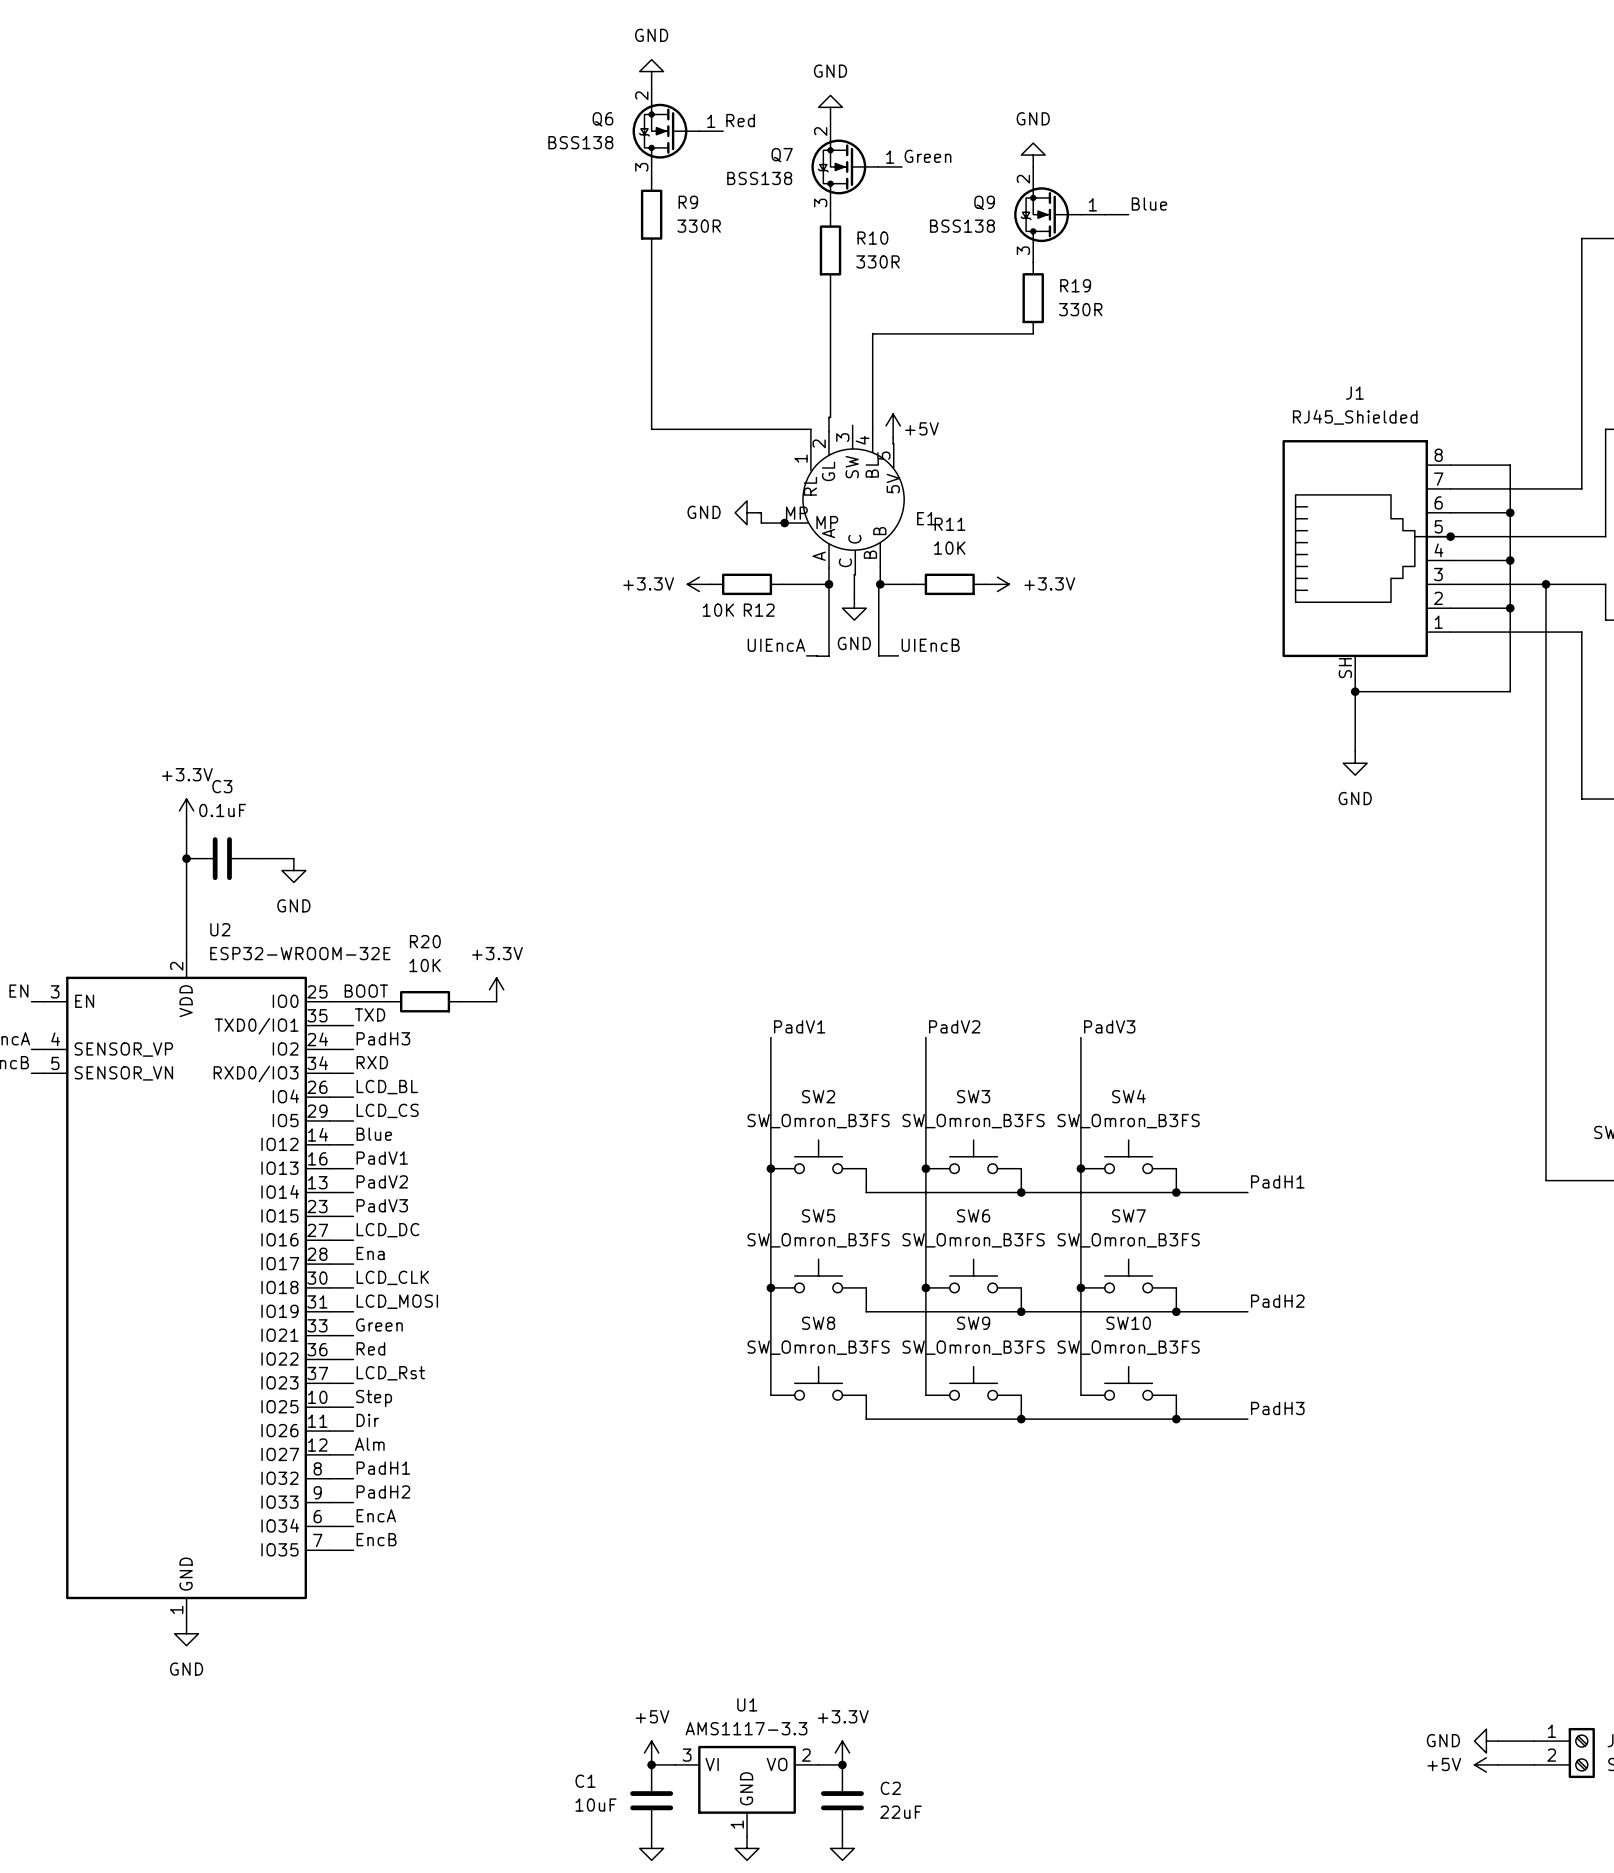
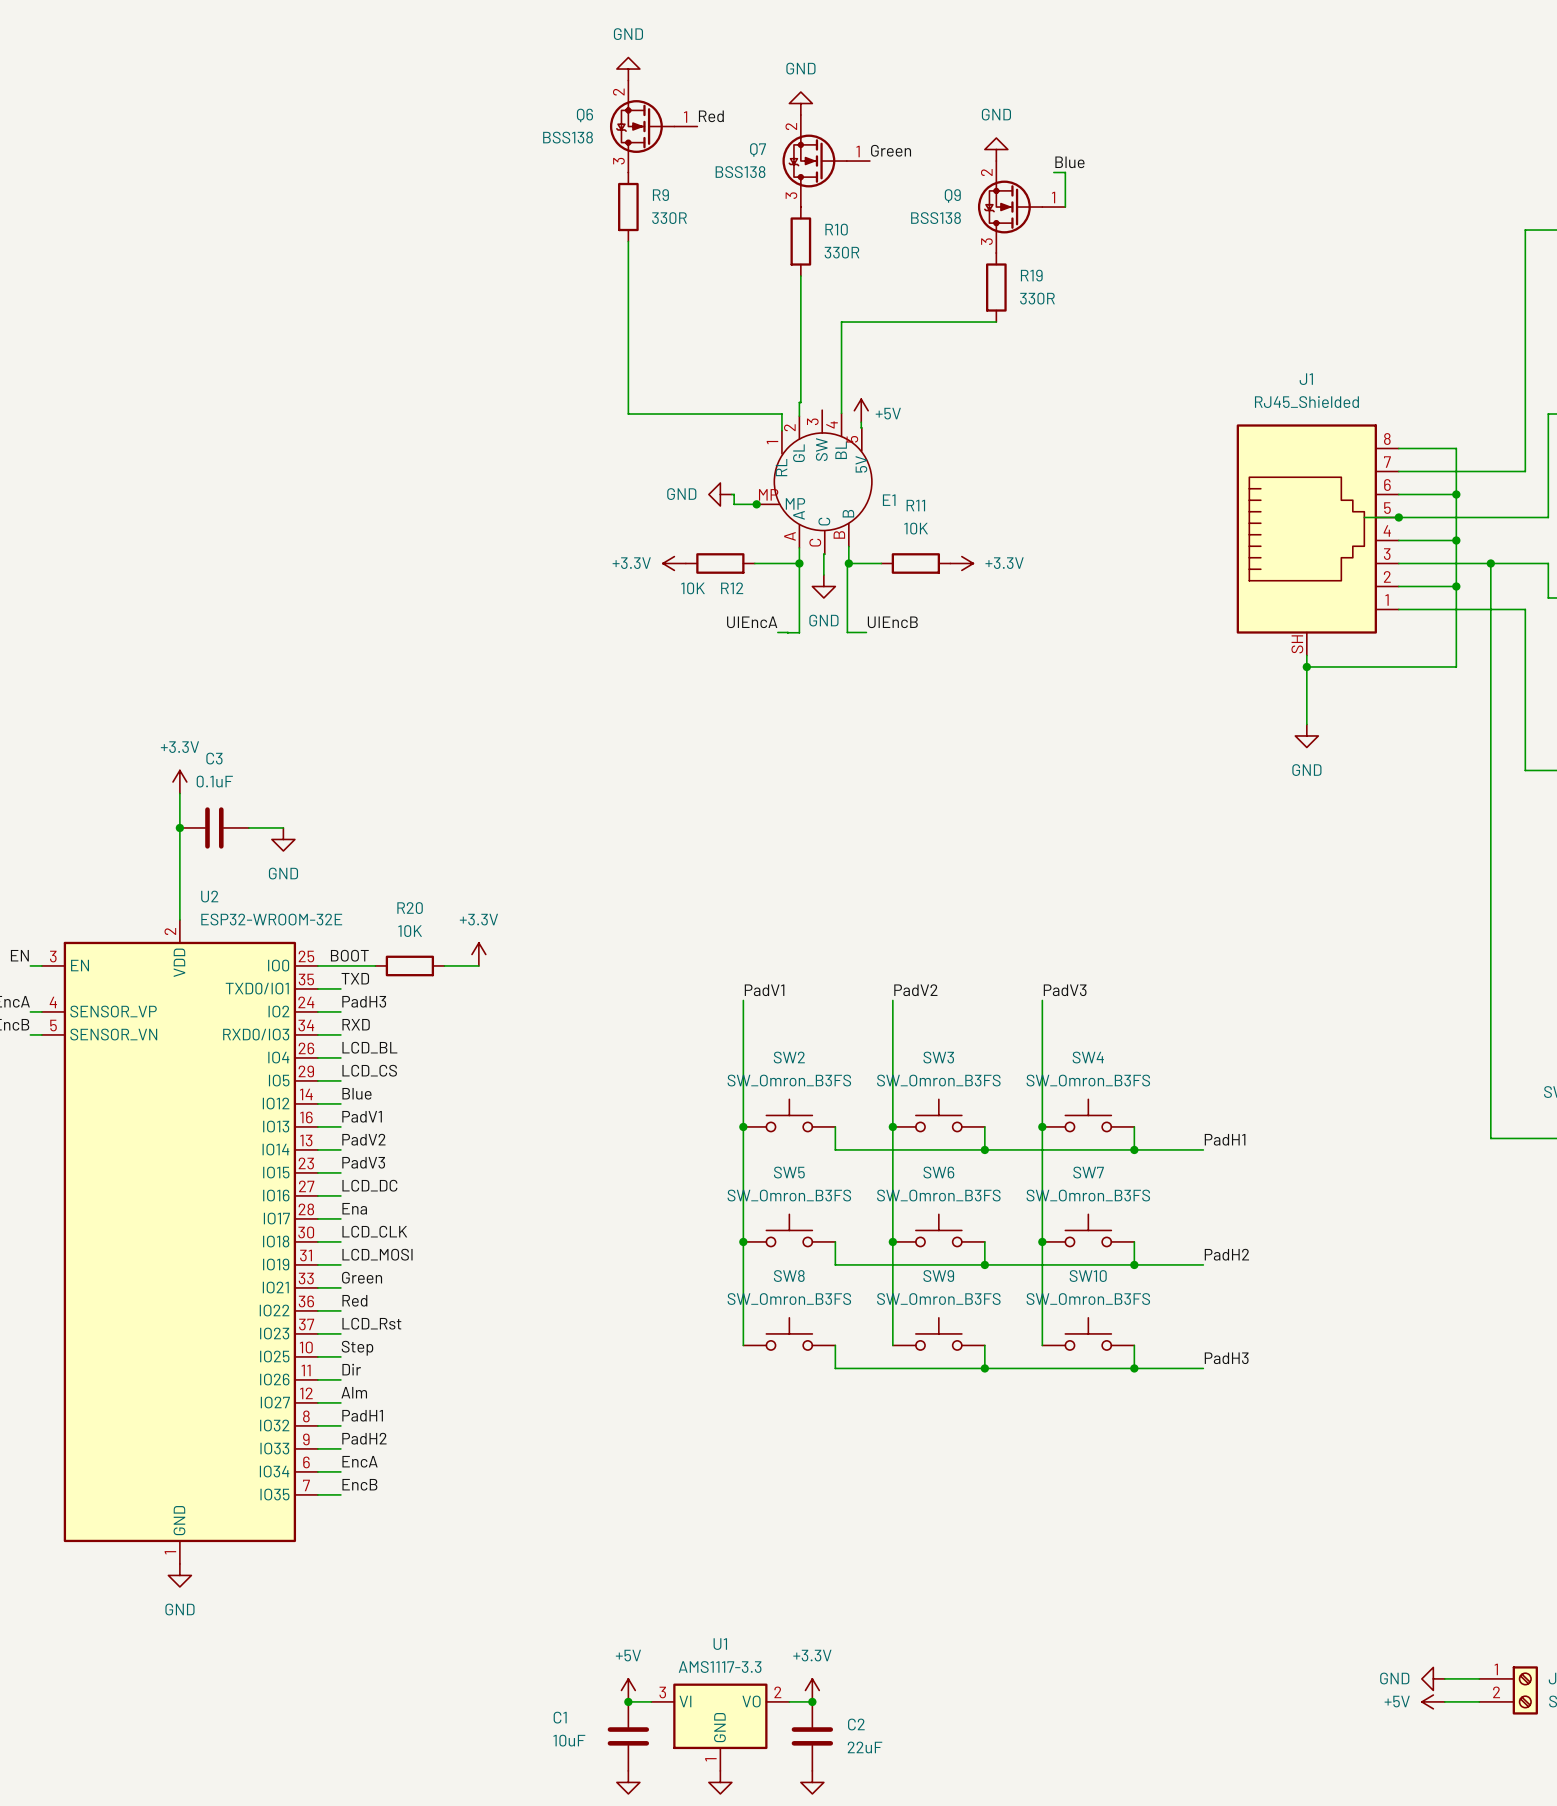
label position: Blue (1149, 204) -> Blue (1069, 162)
wire: (1104, 214) (1128, 214) -> (1065, 207) (1065, 172) (1053, 172)

